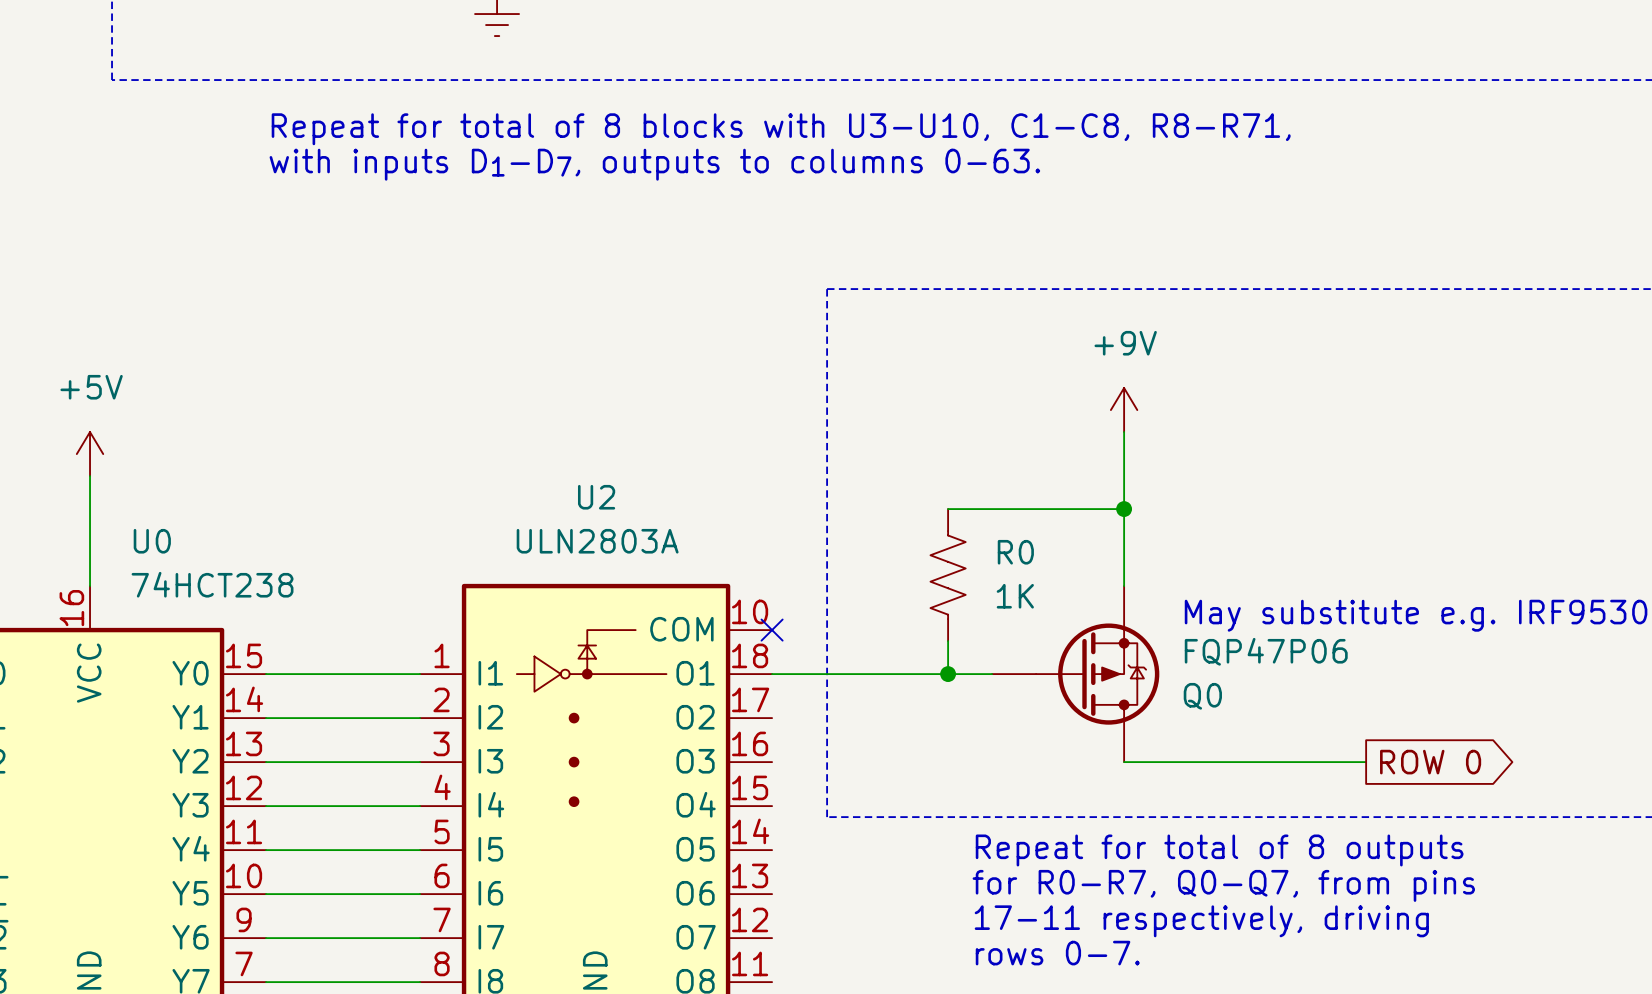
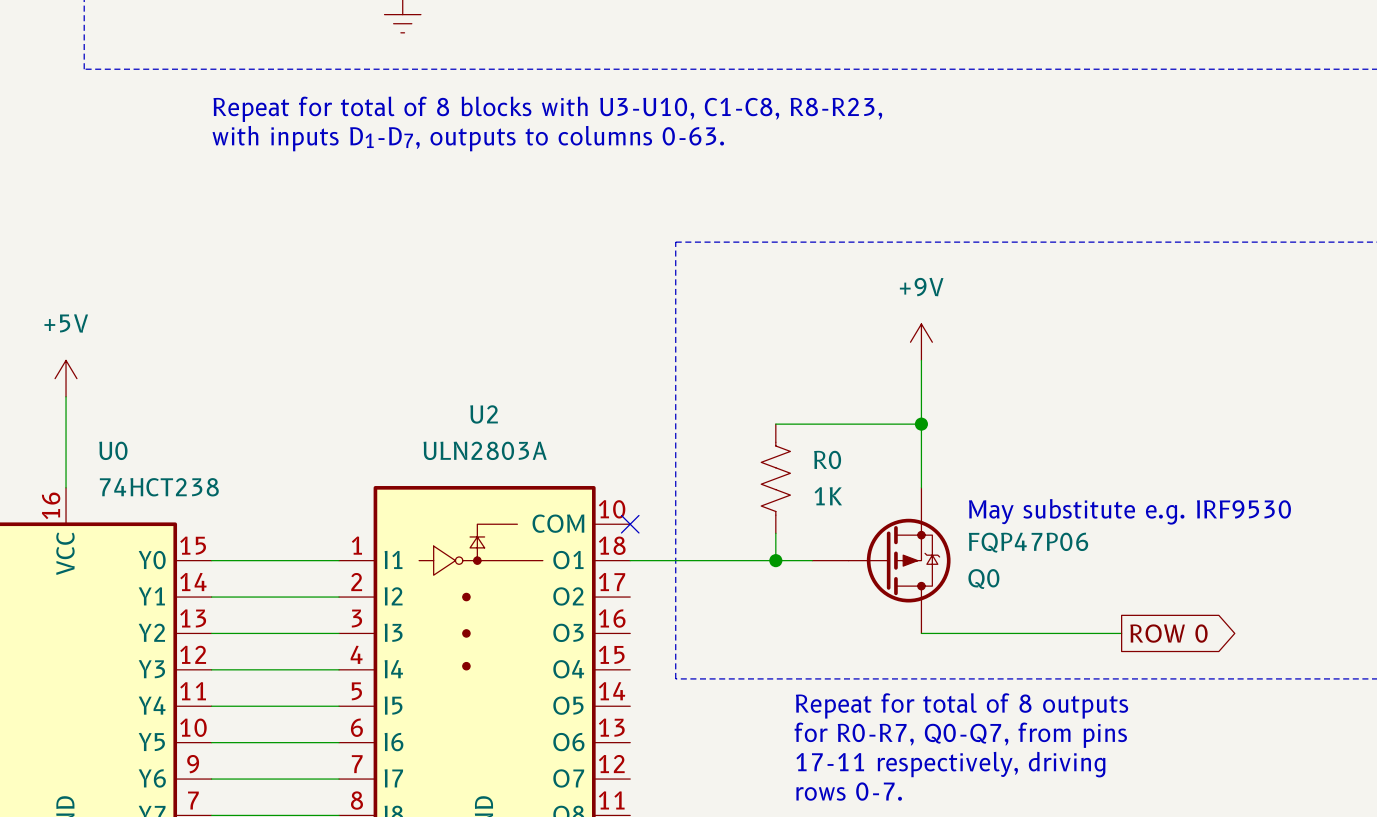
text: Repeat for total of 8 blocks with U3-U10, C1-C8, R8-R71, (781, 129) -> Repeat for total of 8 blocks with U3-U10, C1-C8, R8-R23, (547, 109)

